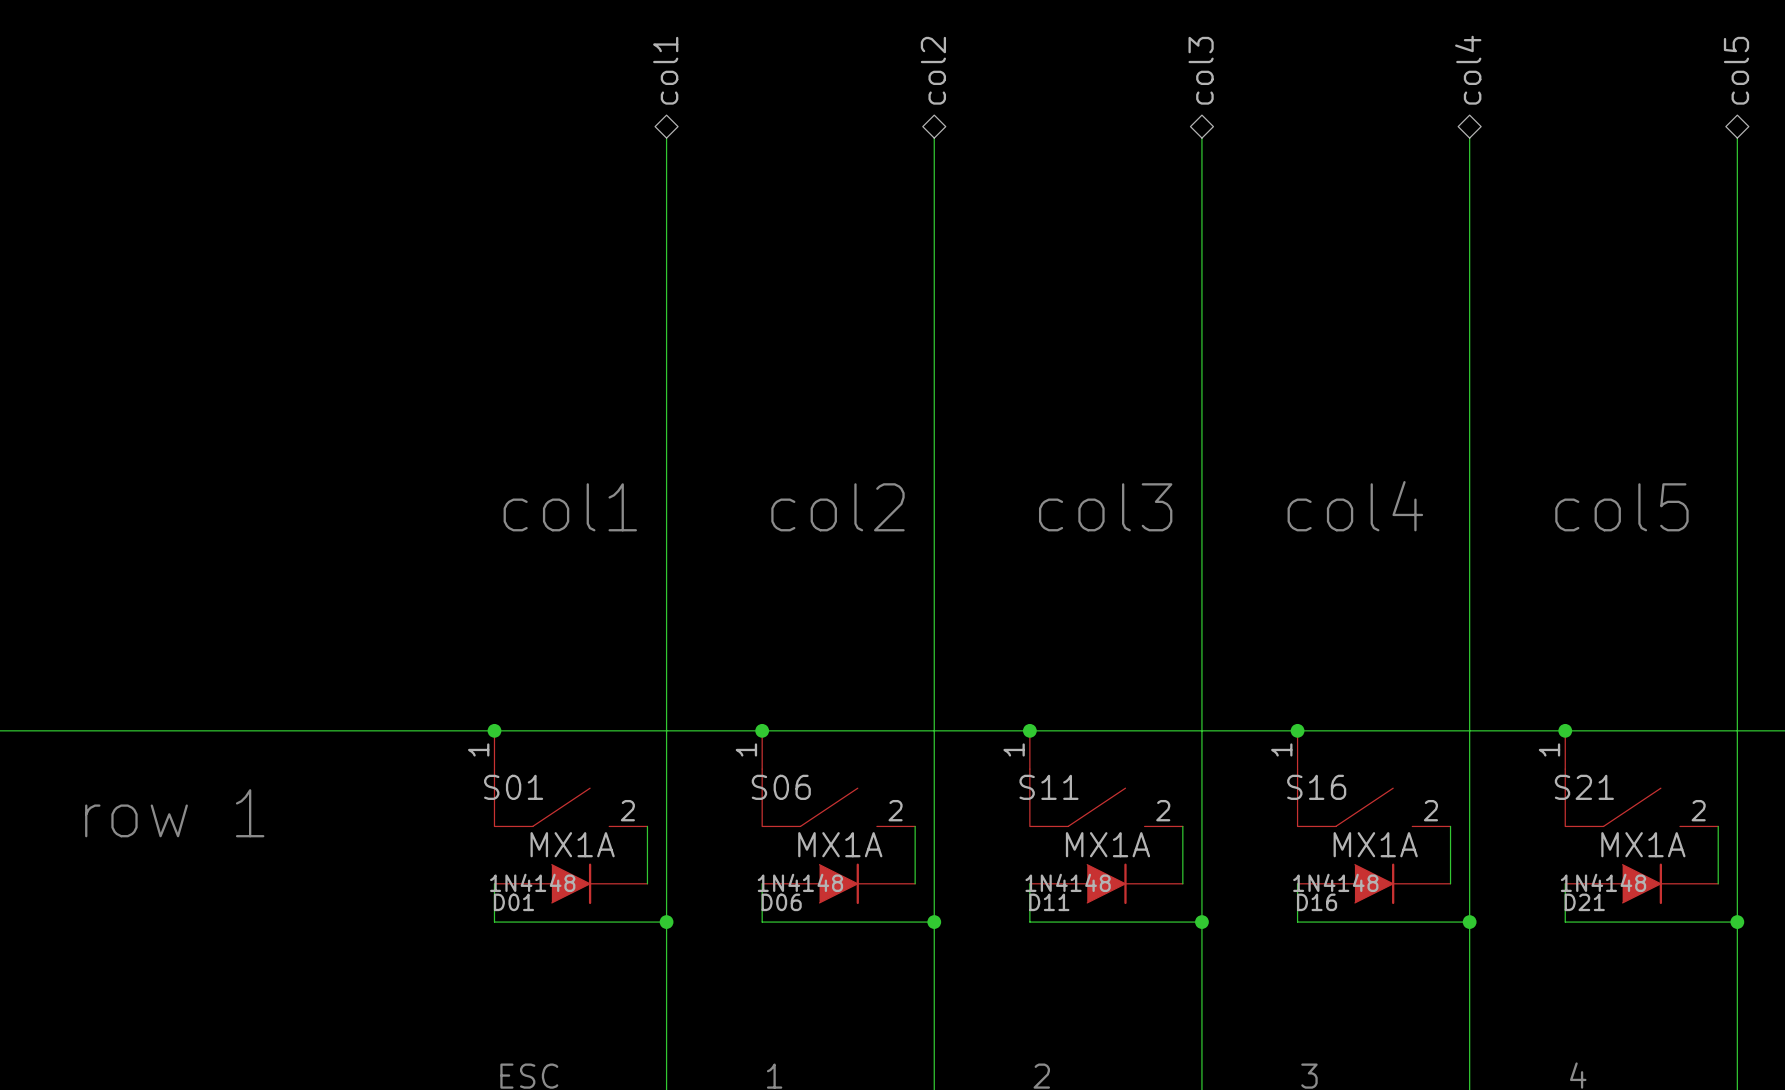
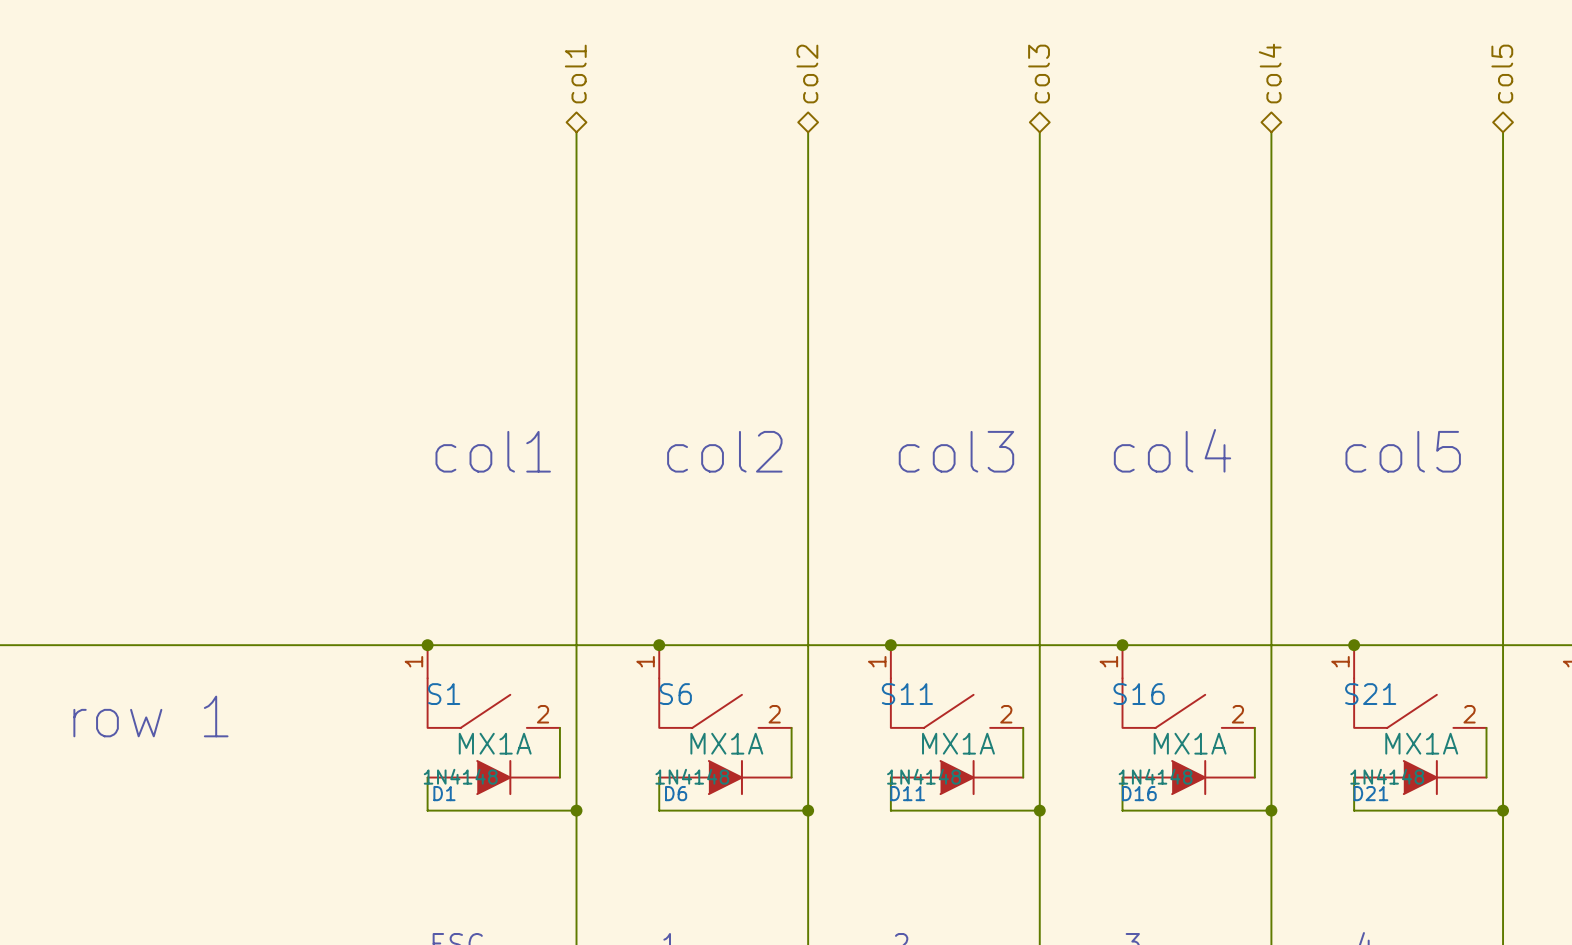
S01 name: S01 (513, 787) -> S1 (444, 694)
S06 name: S06 (781, 787) -> S6 (675, 694)
D01 name: D01 (513, 902) -> D1 (444, 793)
D06 name: D06 (781, 902) -> D6 (676, 793)

